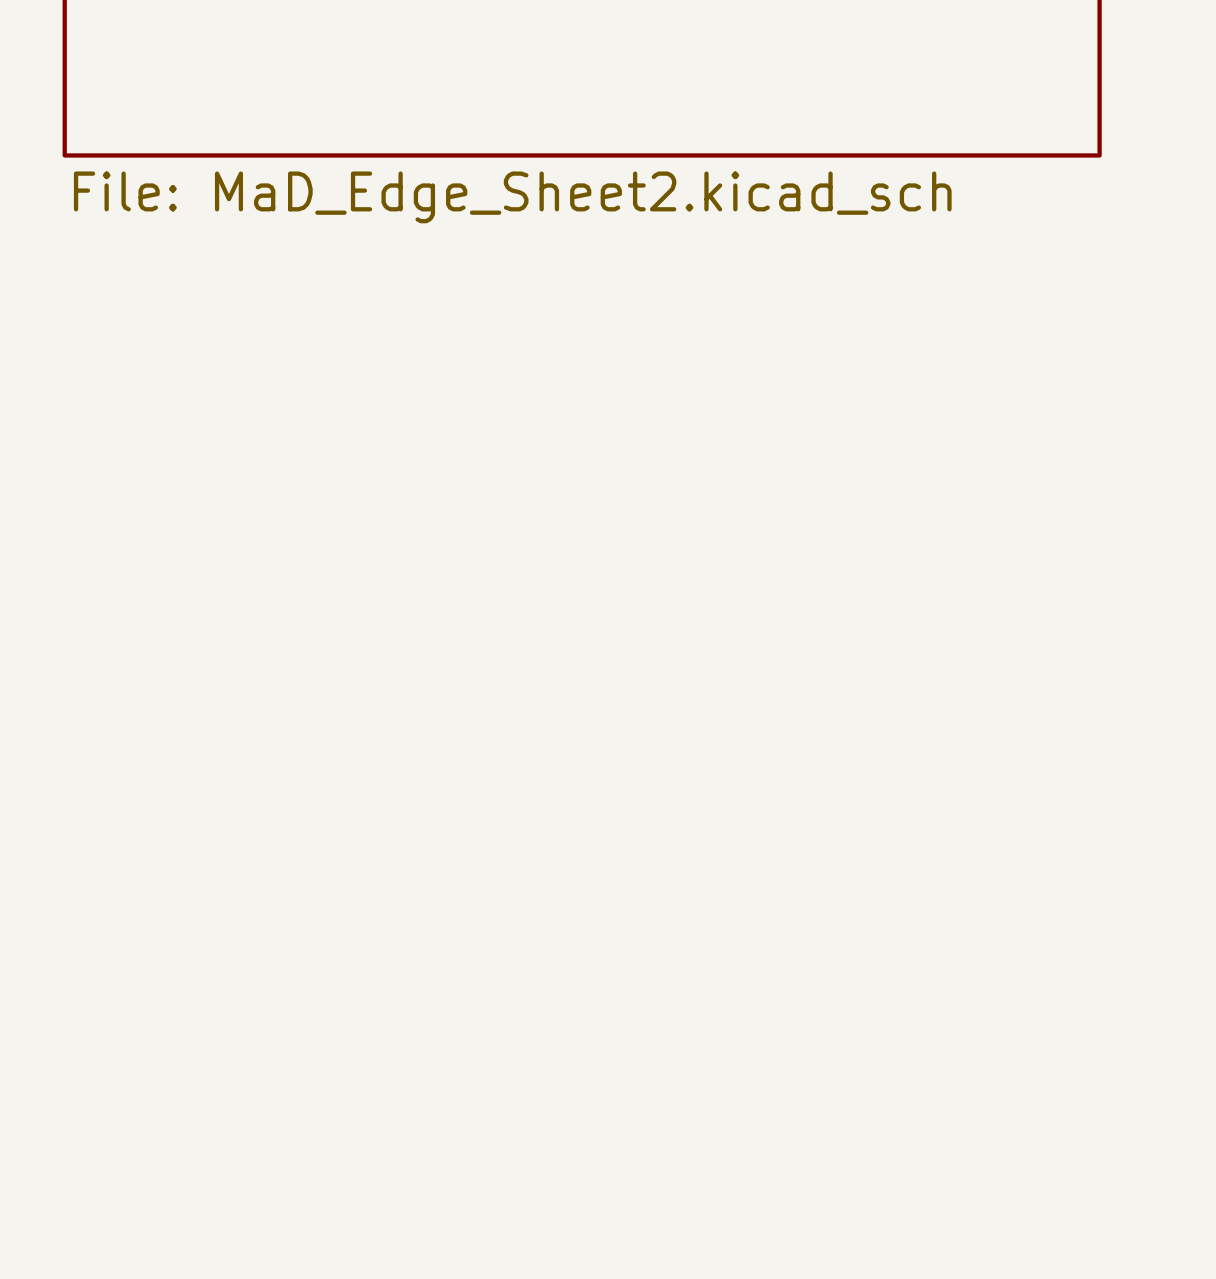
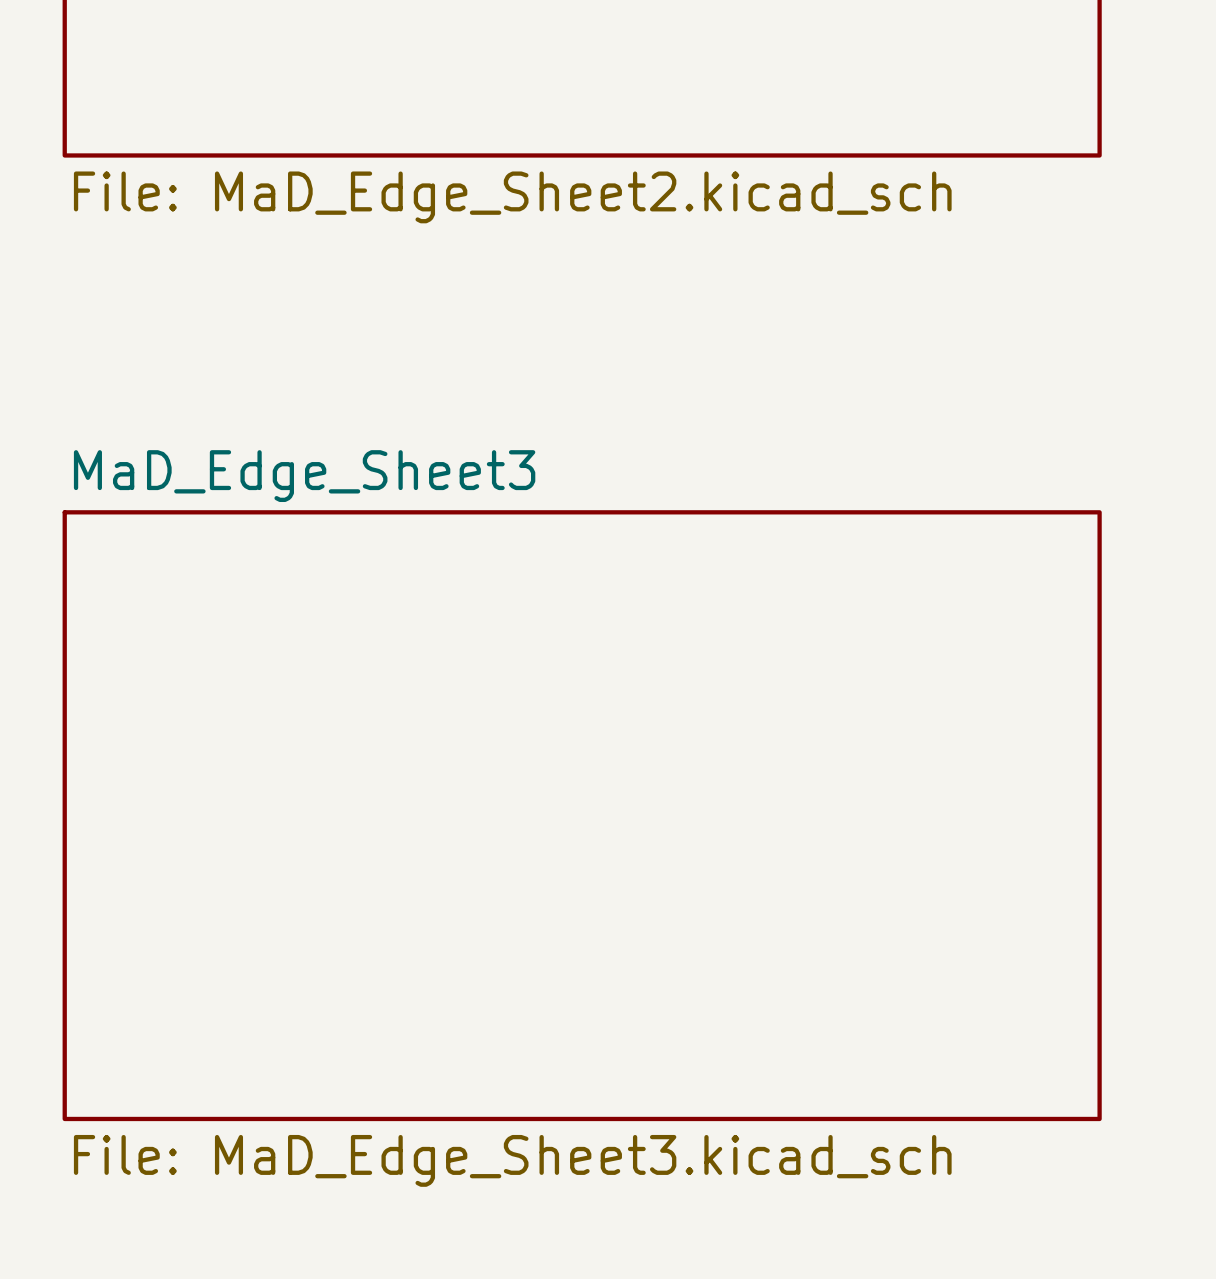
sheet MaD_Edge_Sheet3: none -> File: MaD_Edge_Sheet3.kicad_sch (582, 815)

